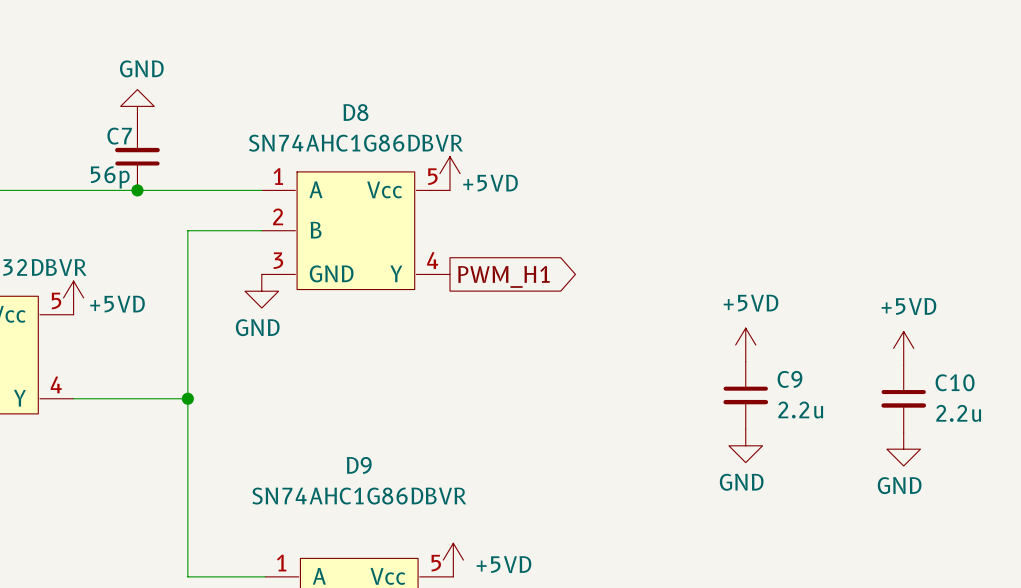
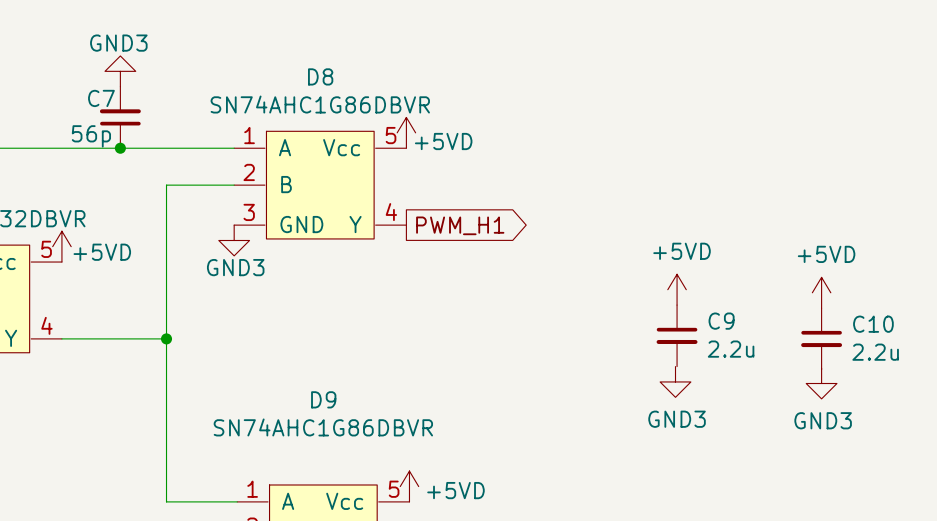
power symbol: GND (137, 106) -> GND3 (120, 71)
power symbol: GND (261, 291) -> GND3 (234, 240)
power symbol: GND (745, 445) -> GND3 (675, 381)
power symbol: GND (903, 449) -> GND3 (821, 383)

